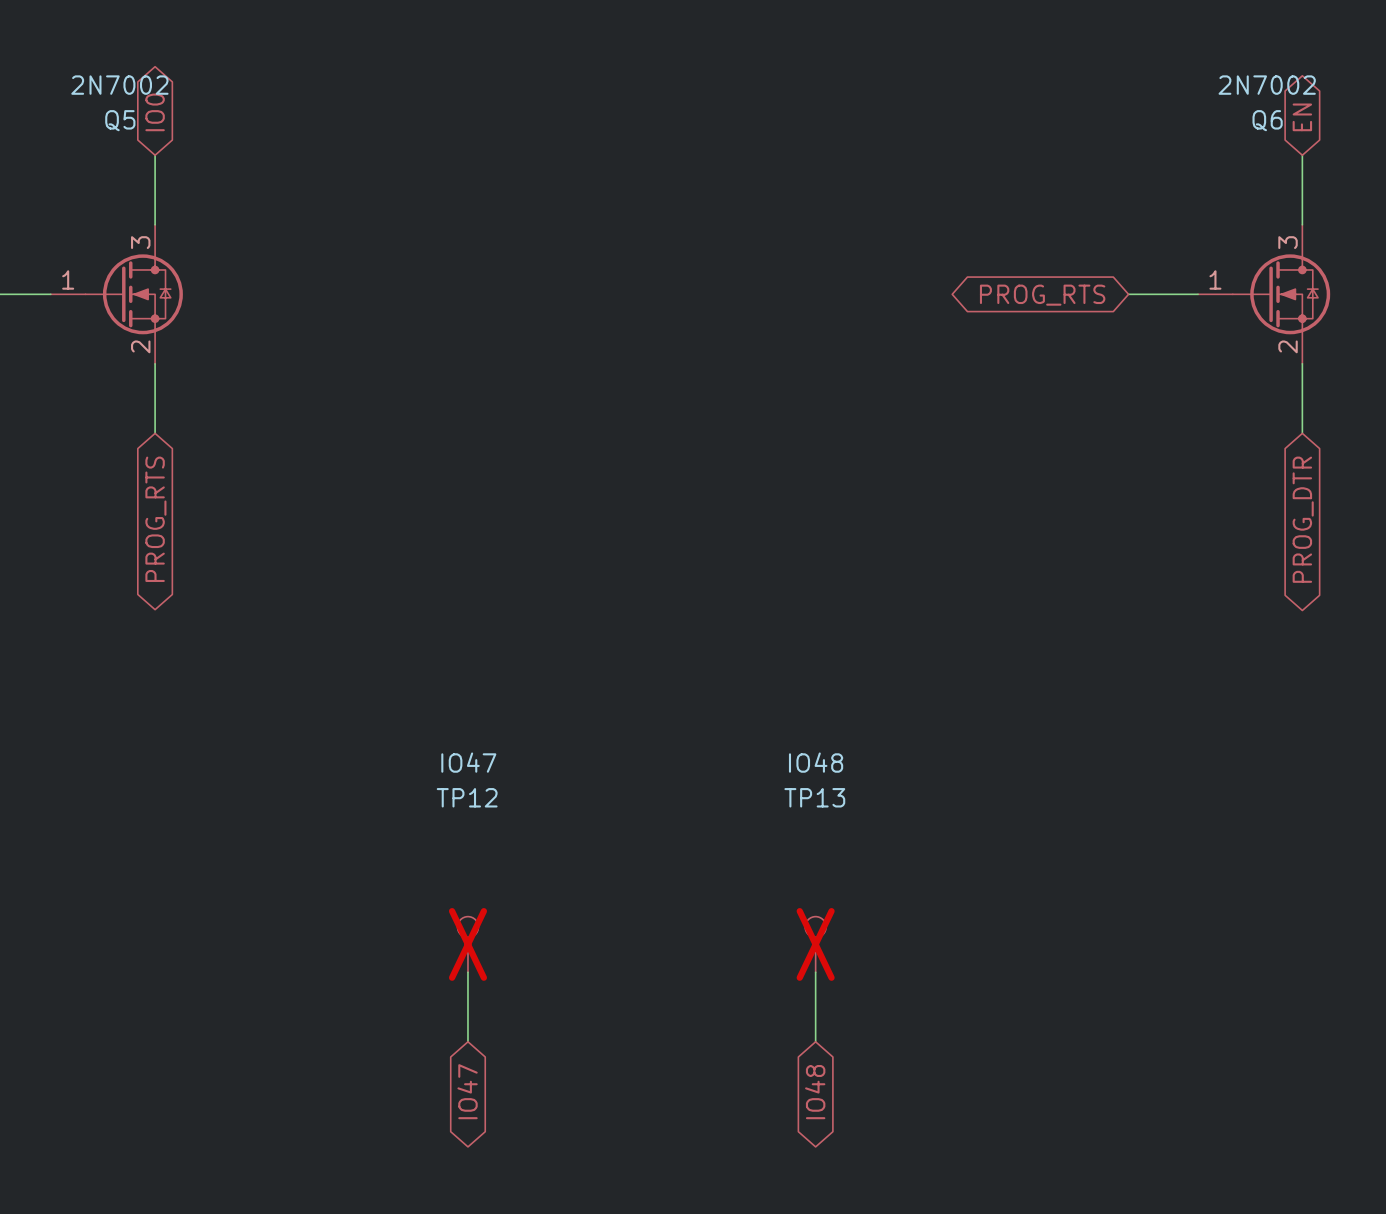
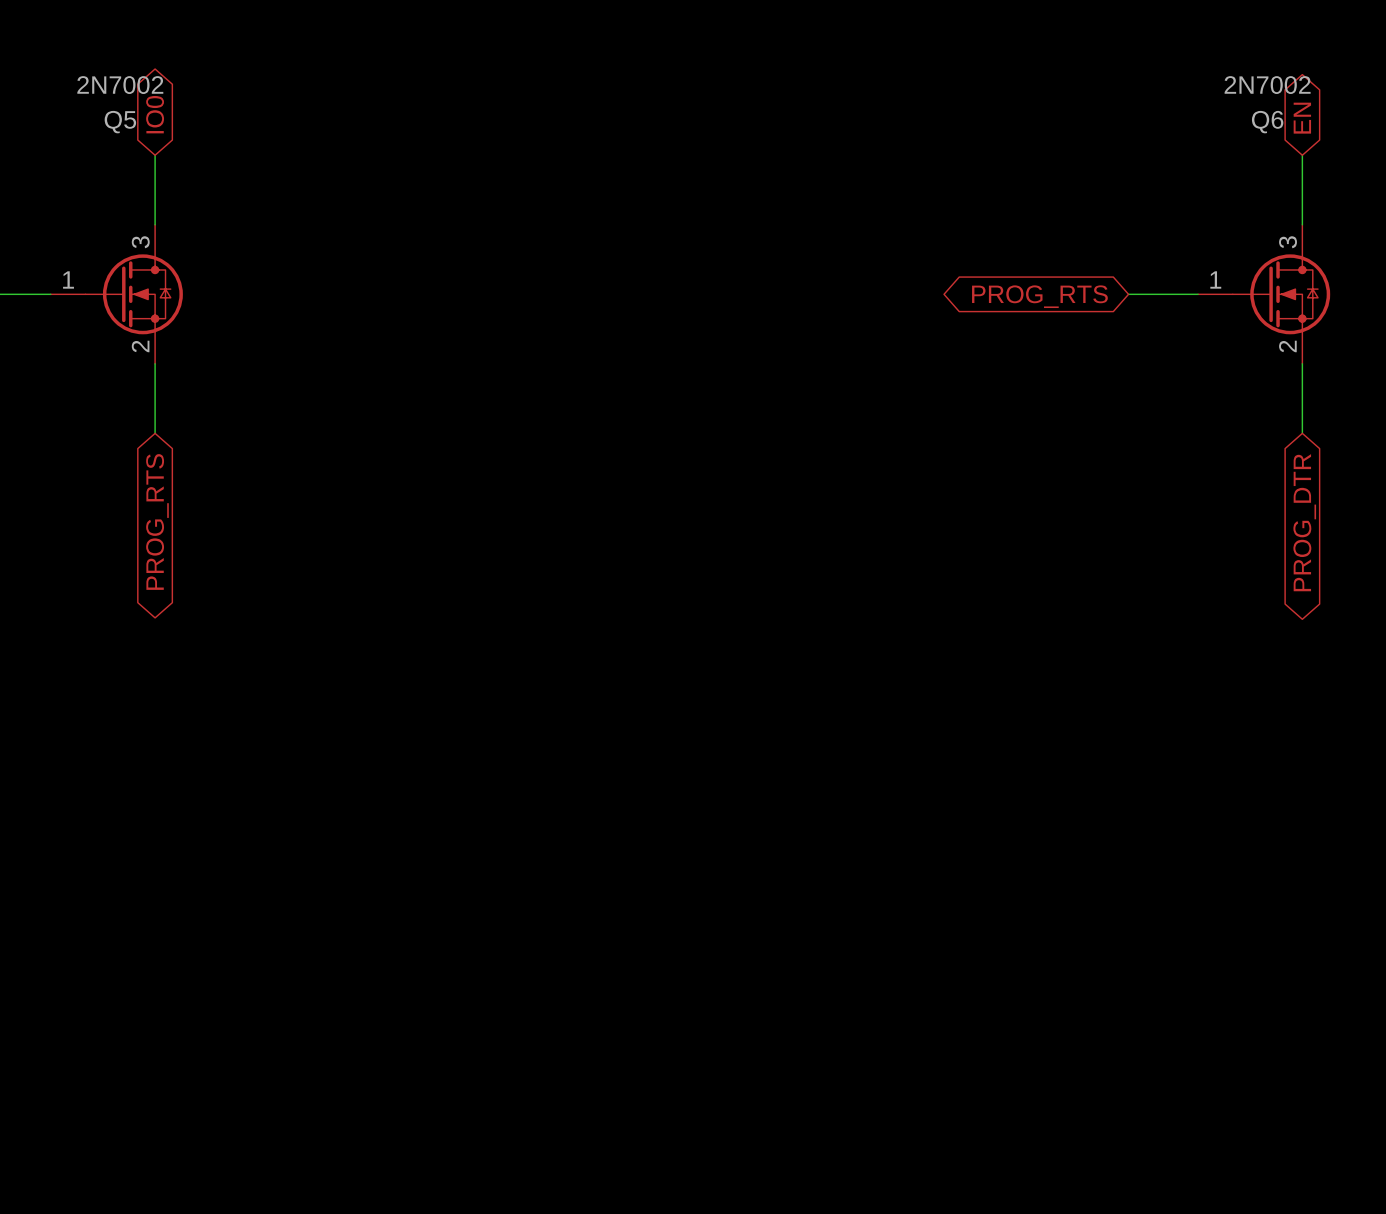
TP12: IO47 (467, 944) -> none
TP13: IO48 (815, 944) -> none
wire: (467, 972) (467, 1041) -> none
wire: (815, 972) (815, 1041) -> none
global label: IO47 (467, 1091) -> none
global label: IO48 (815, 1092) -> none

